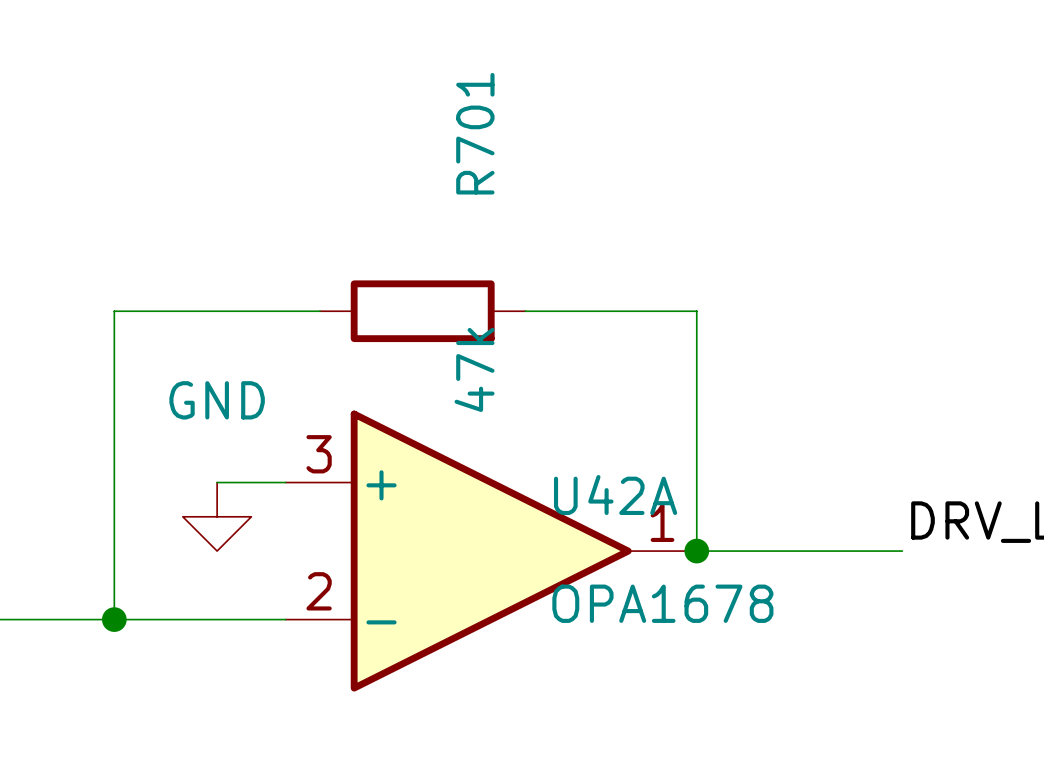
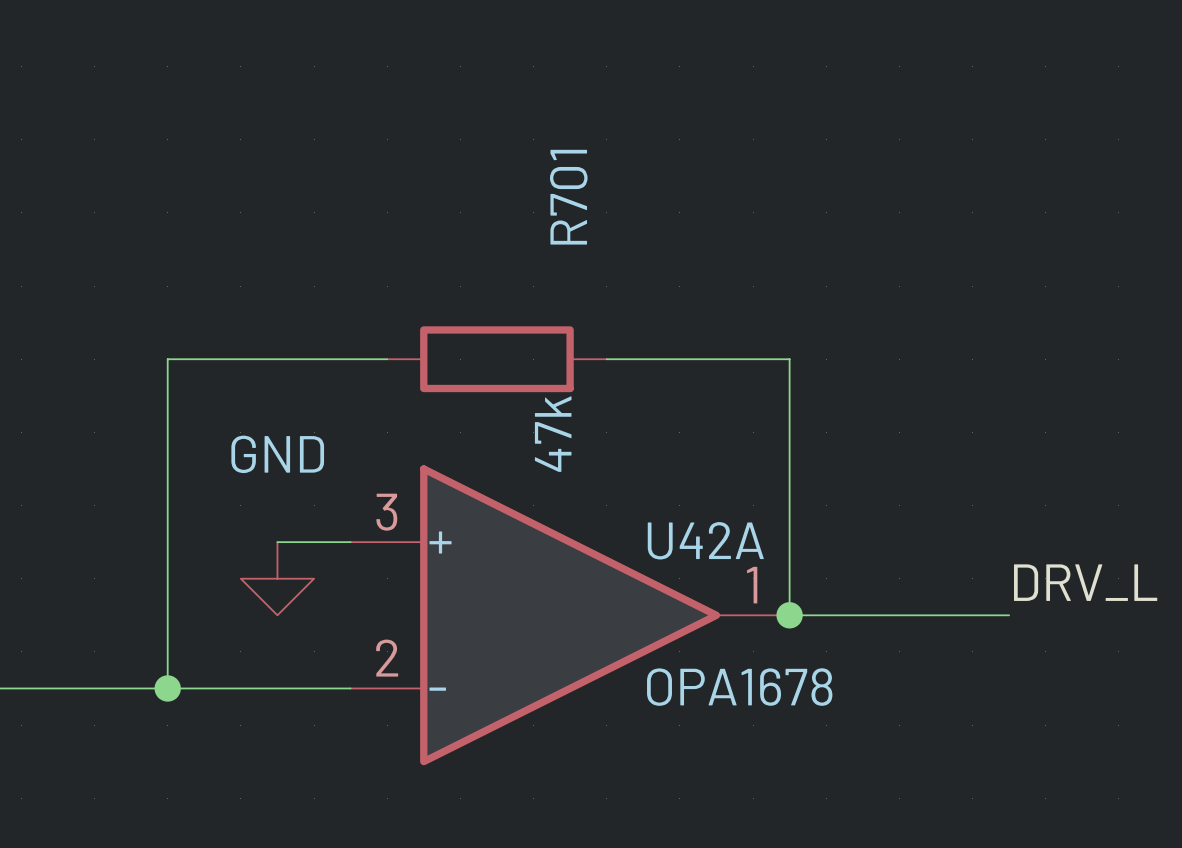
R701 name position: R701 (475, 133) -> R701 (568, 197)
U42A name position: U42A (615, 495) -> U42A (705, 540)
U42A value position: OPA1678 (662, 603) -> OPA1678 (739, 687)

